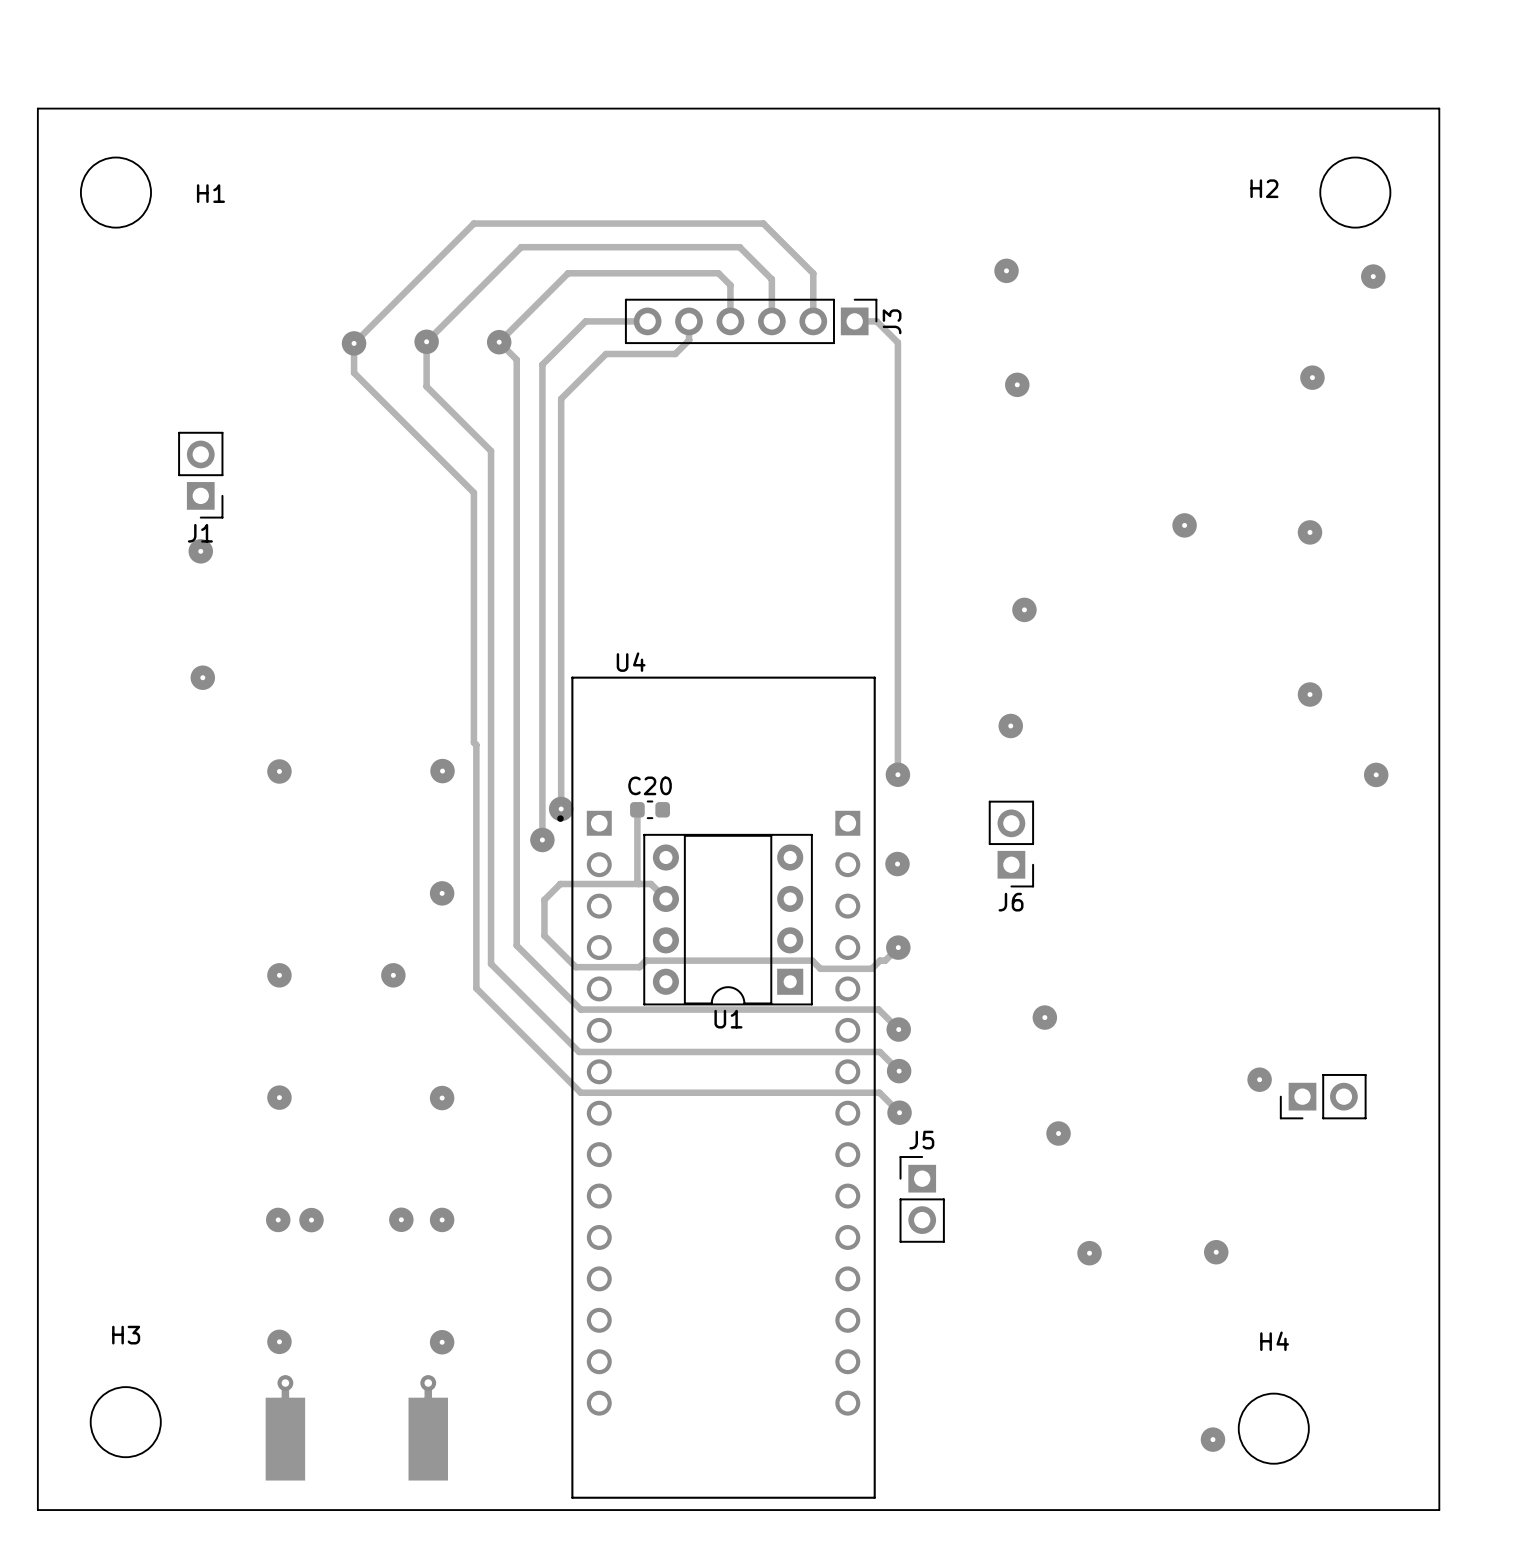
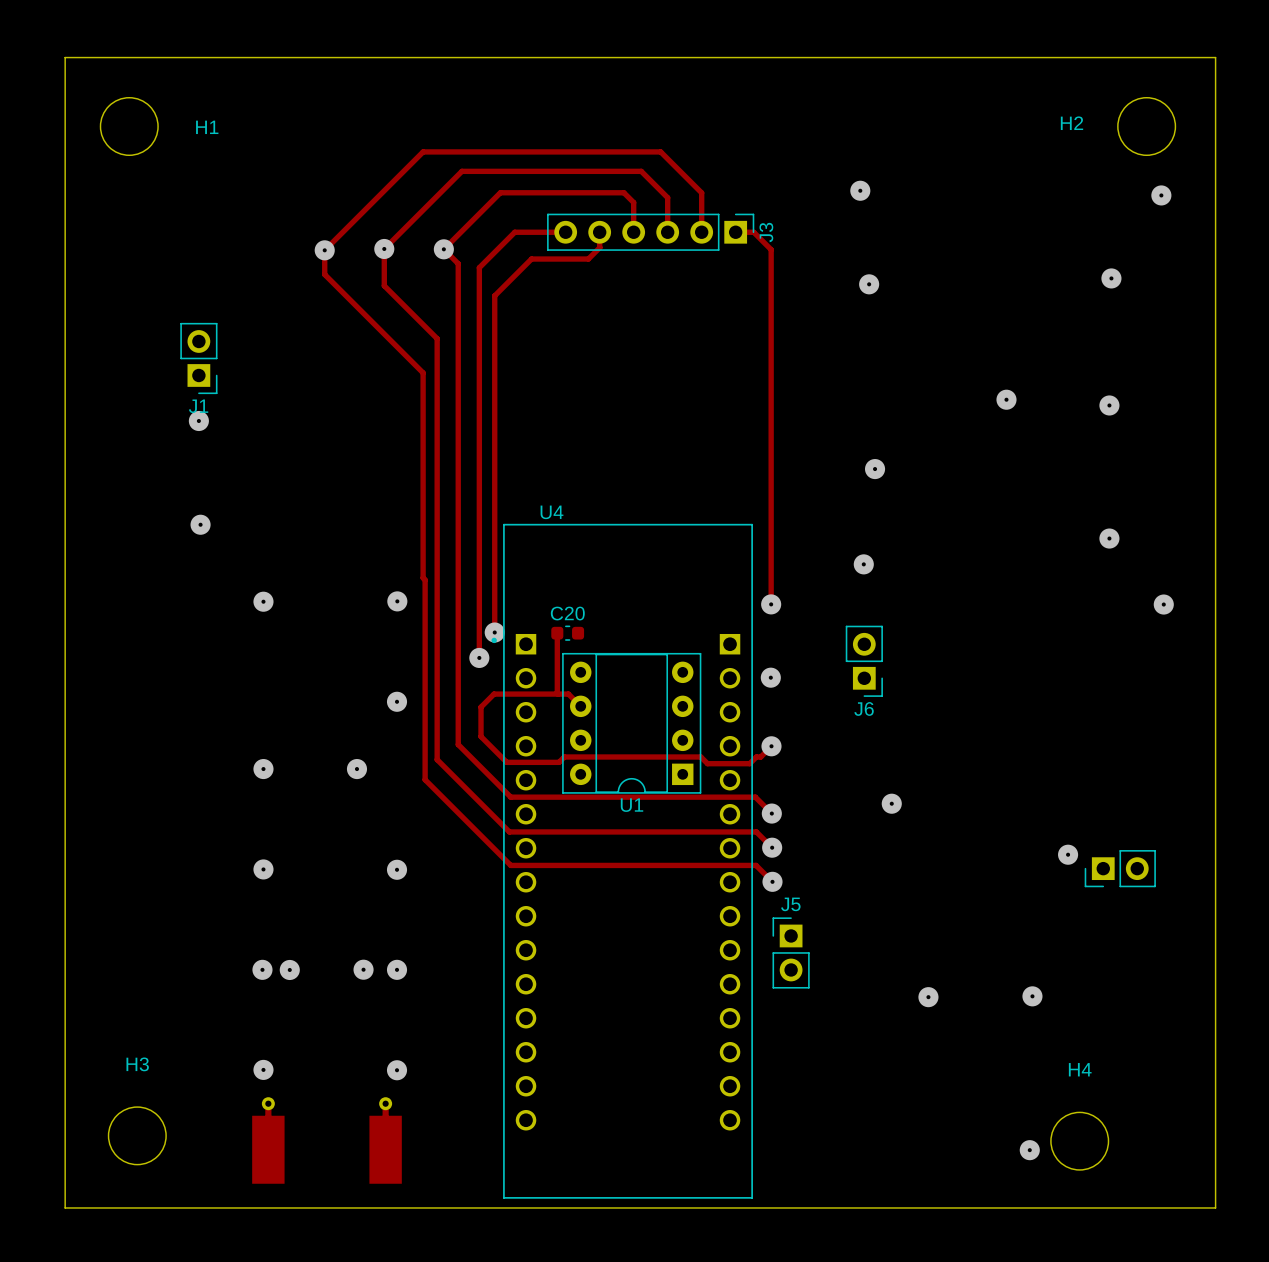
via: (1058, 1133) -> none

